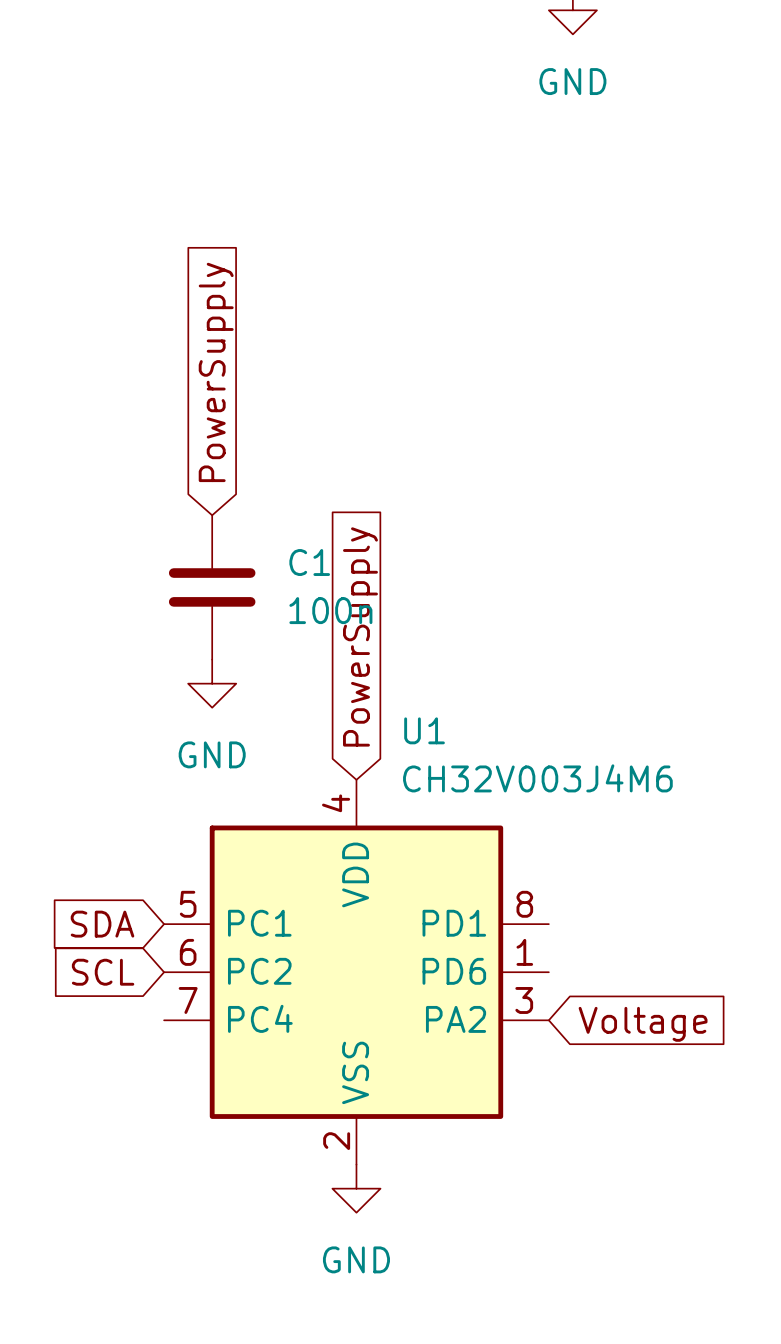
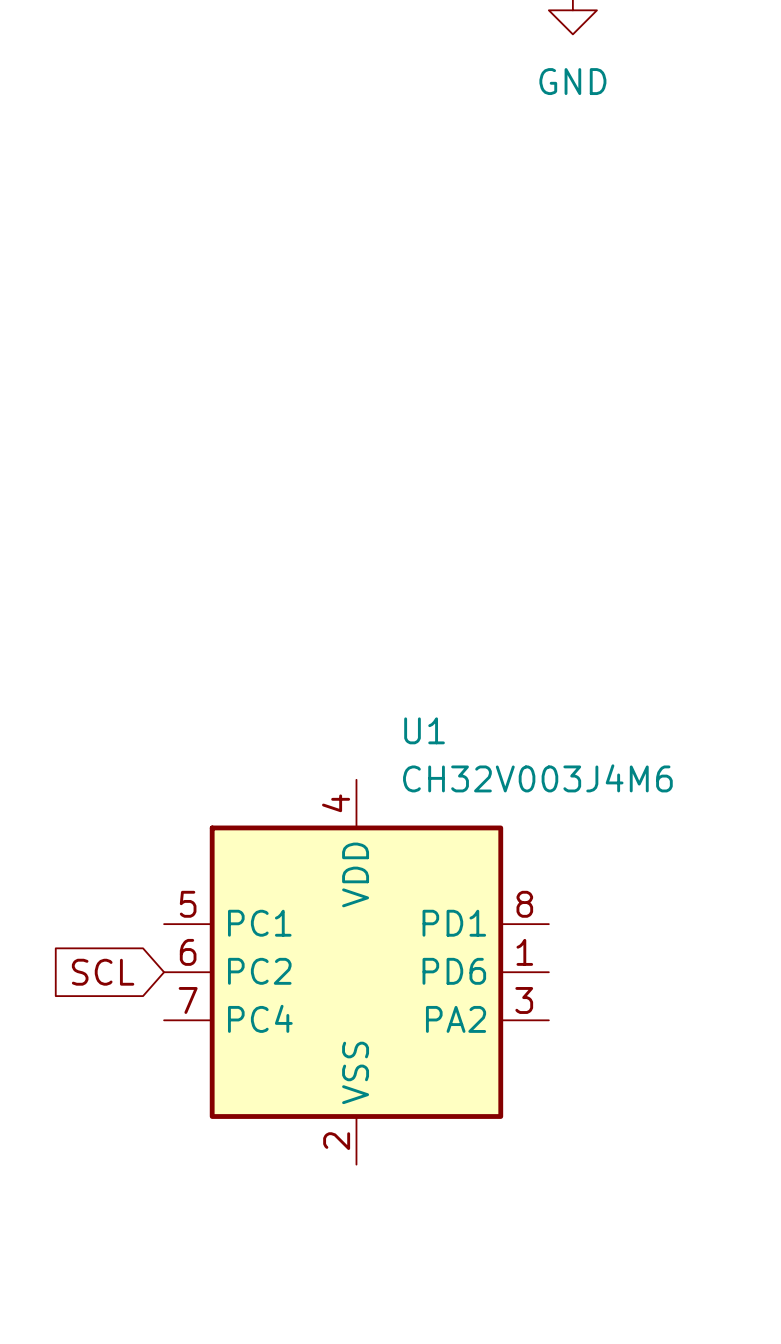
global label: PowerSupply (216, 372) -> none
C1: 100n (212, 587) -> none
global label: PowerSupply (360, 636) -> none
power symbol: GND (212, 683) -> none
global label: SDA (102, 924) -> none
global label: Voltage (643, 1024) -> none
power symbol: GND (356, 1188) -> none

